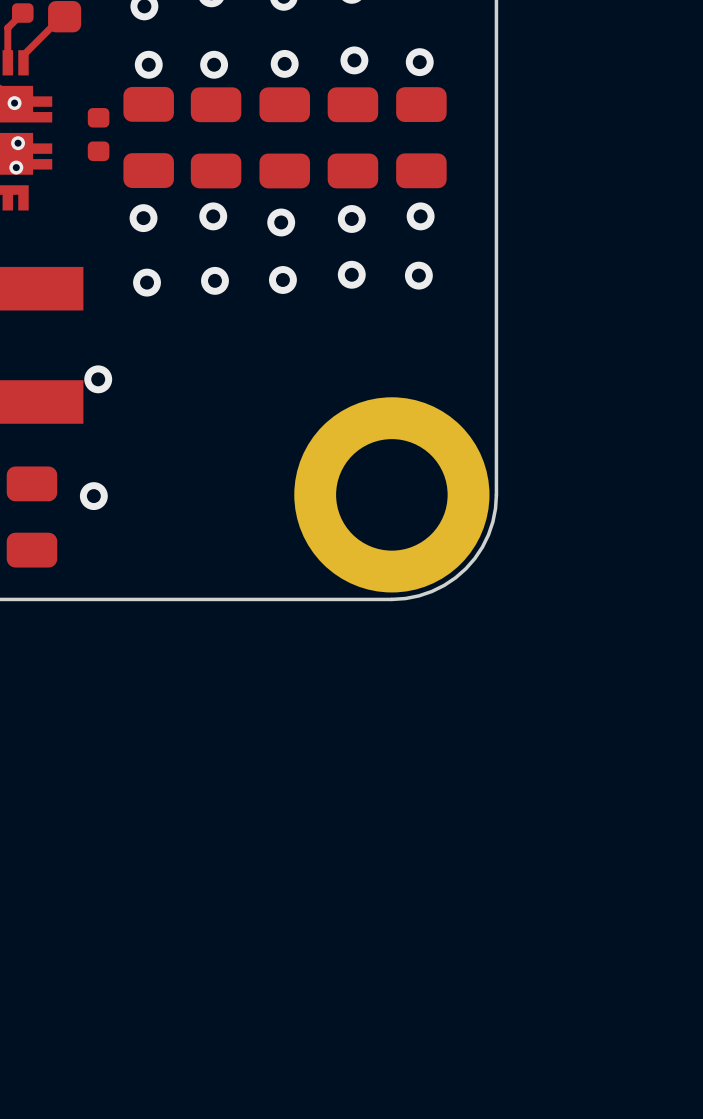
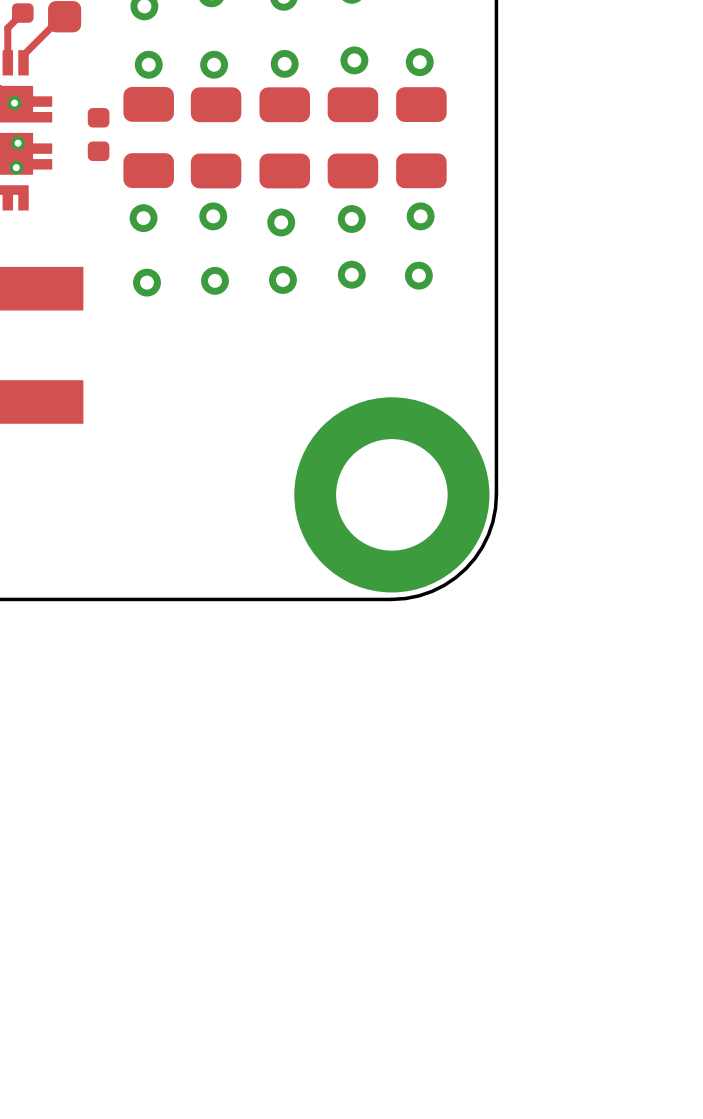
via: (98, 379) -> none
via: (93, 496) -> none
part: (31, 517) -> none

